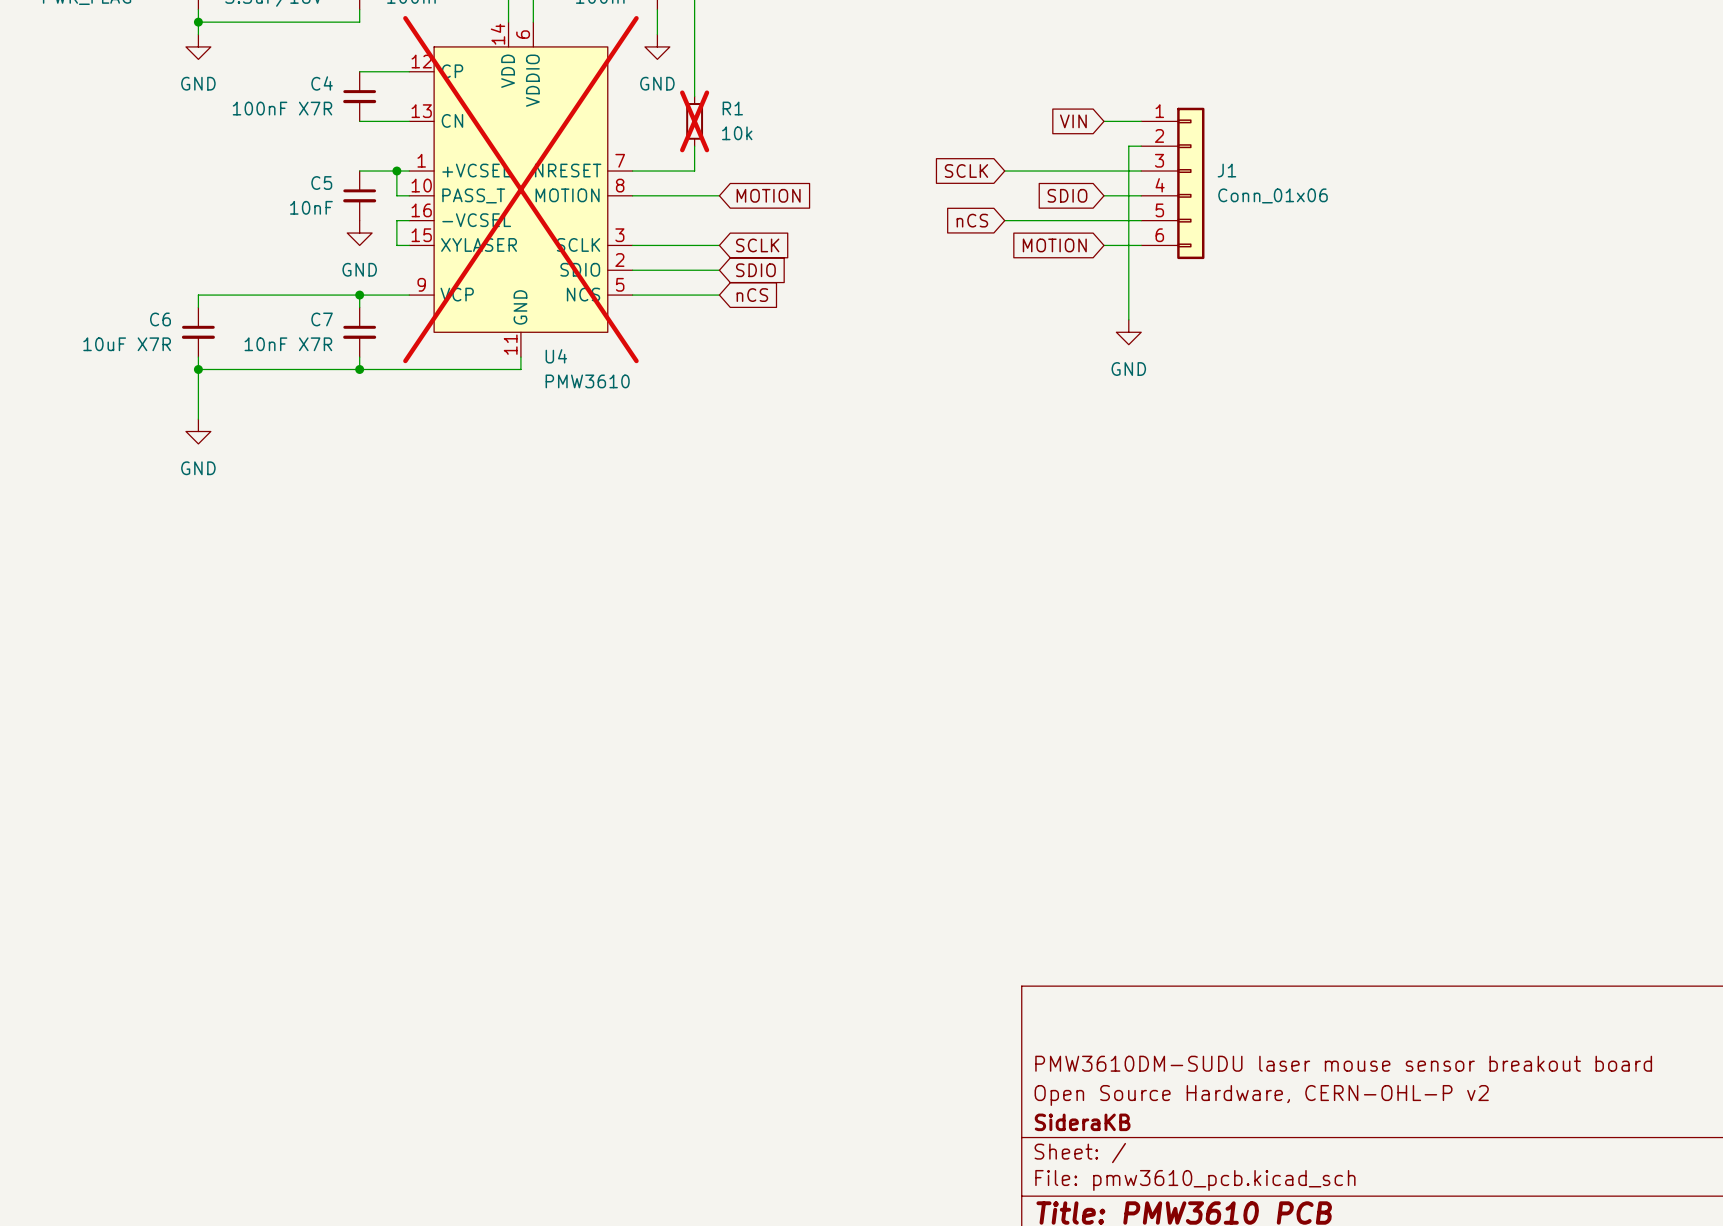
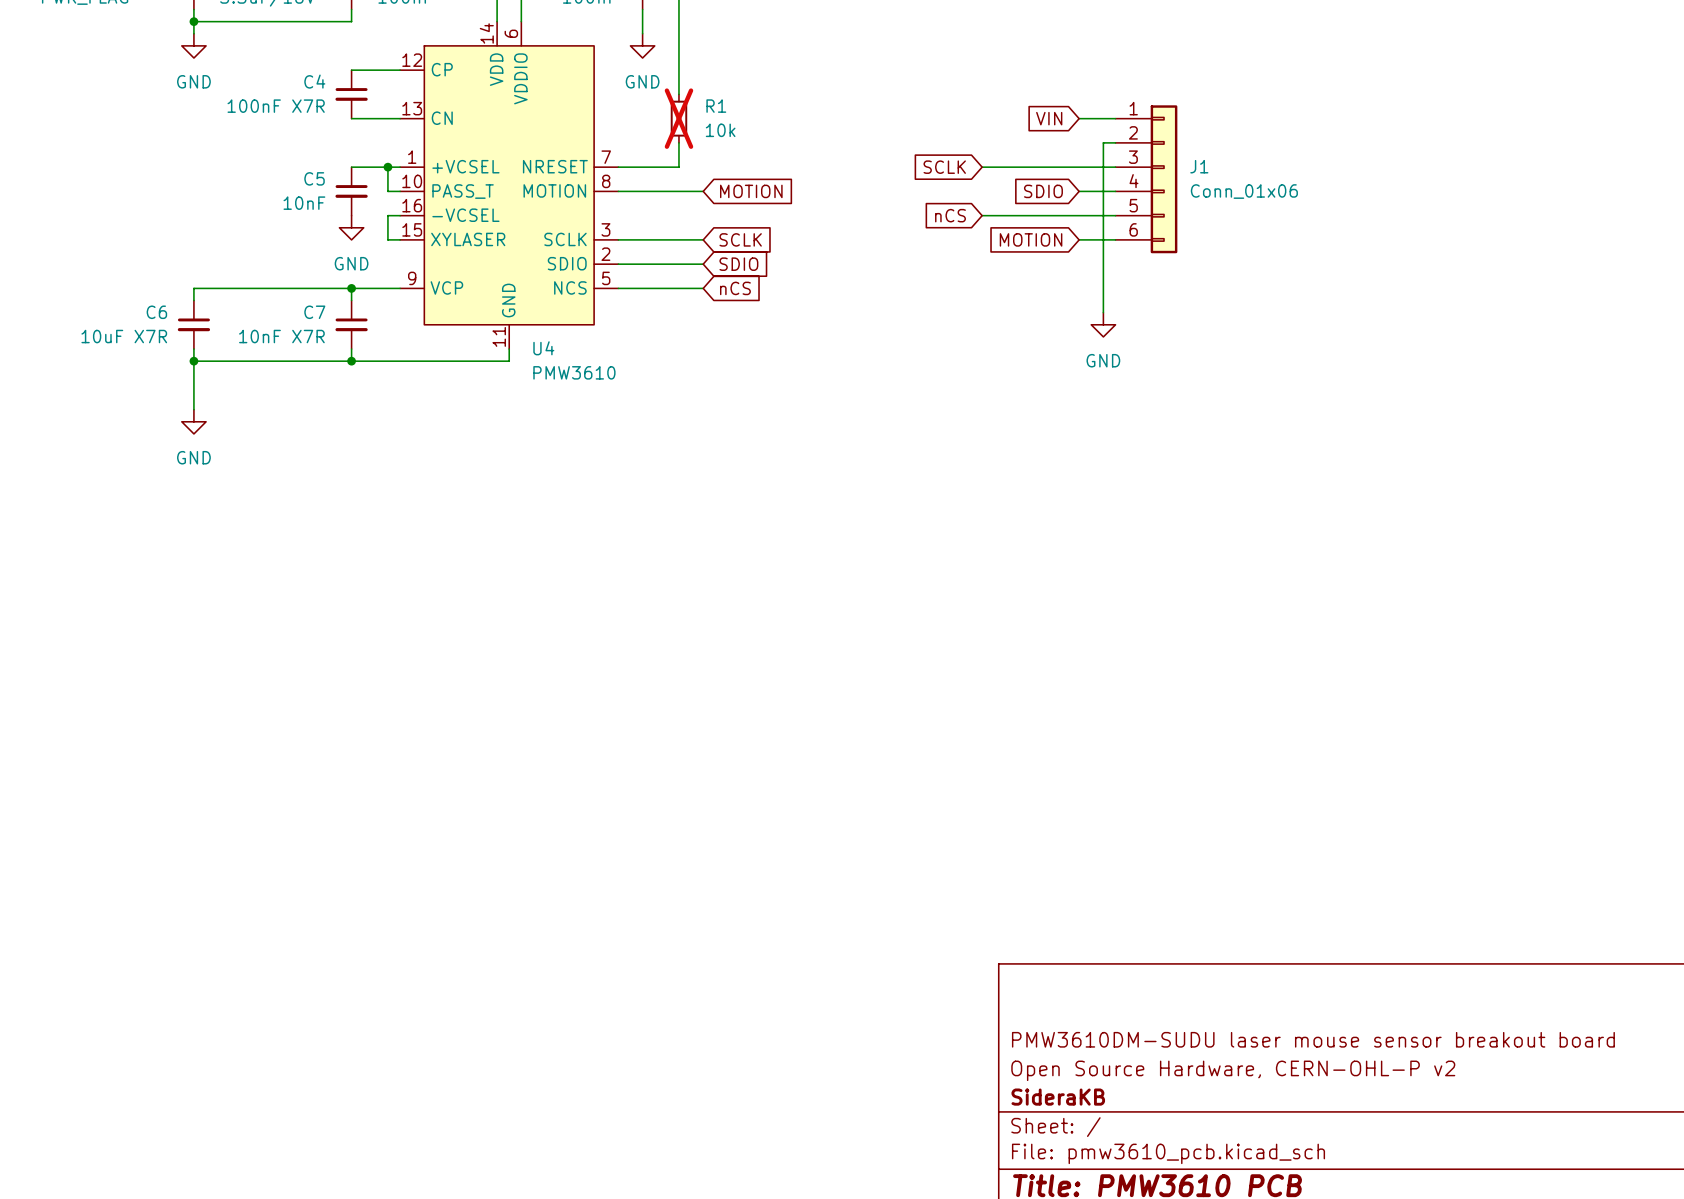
U4 do-not-place cross: (520, 189) -> none

